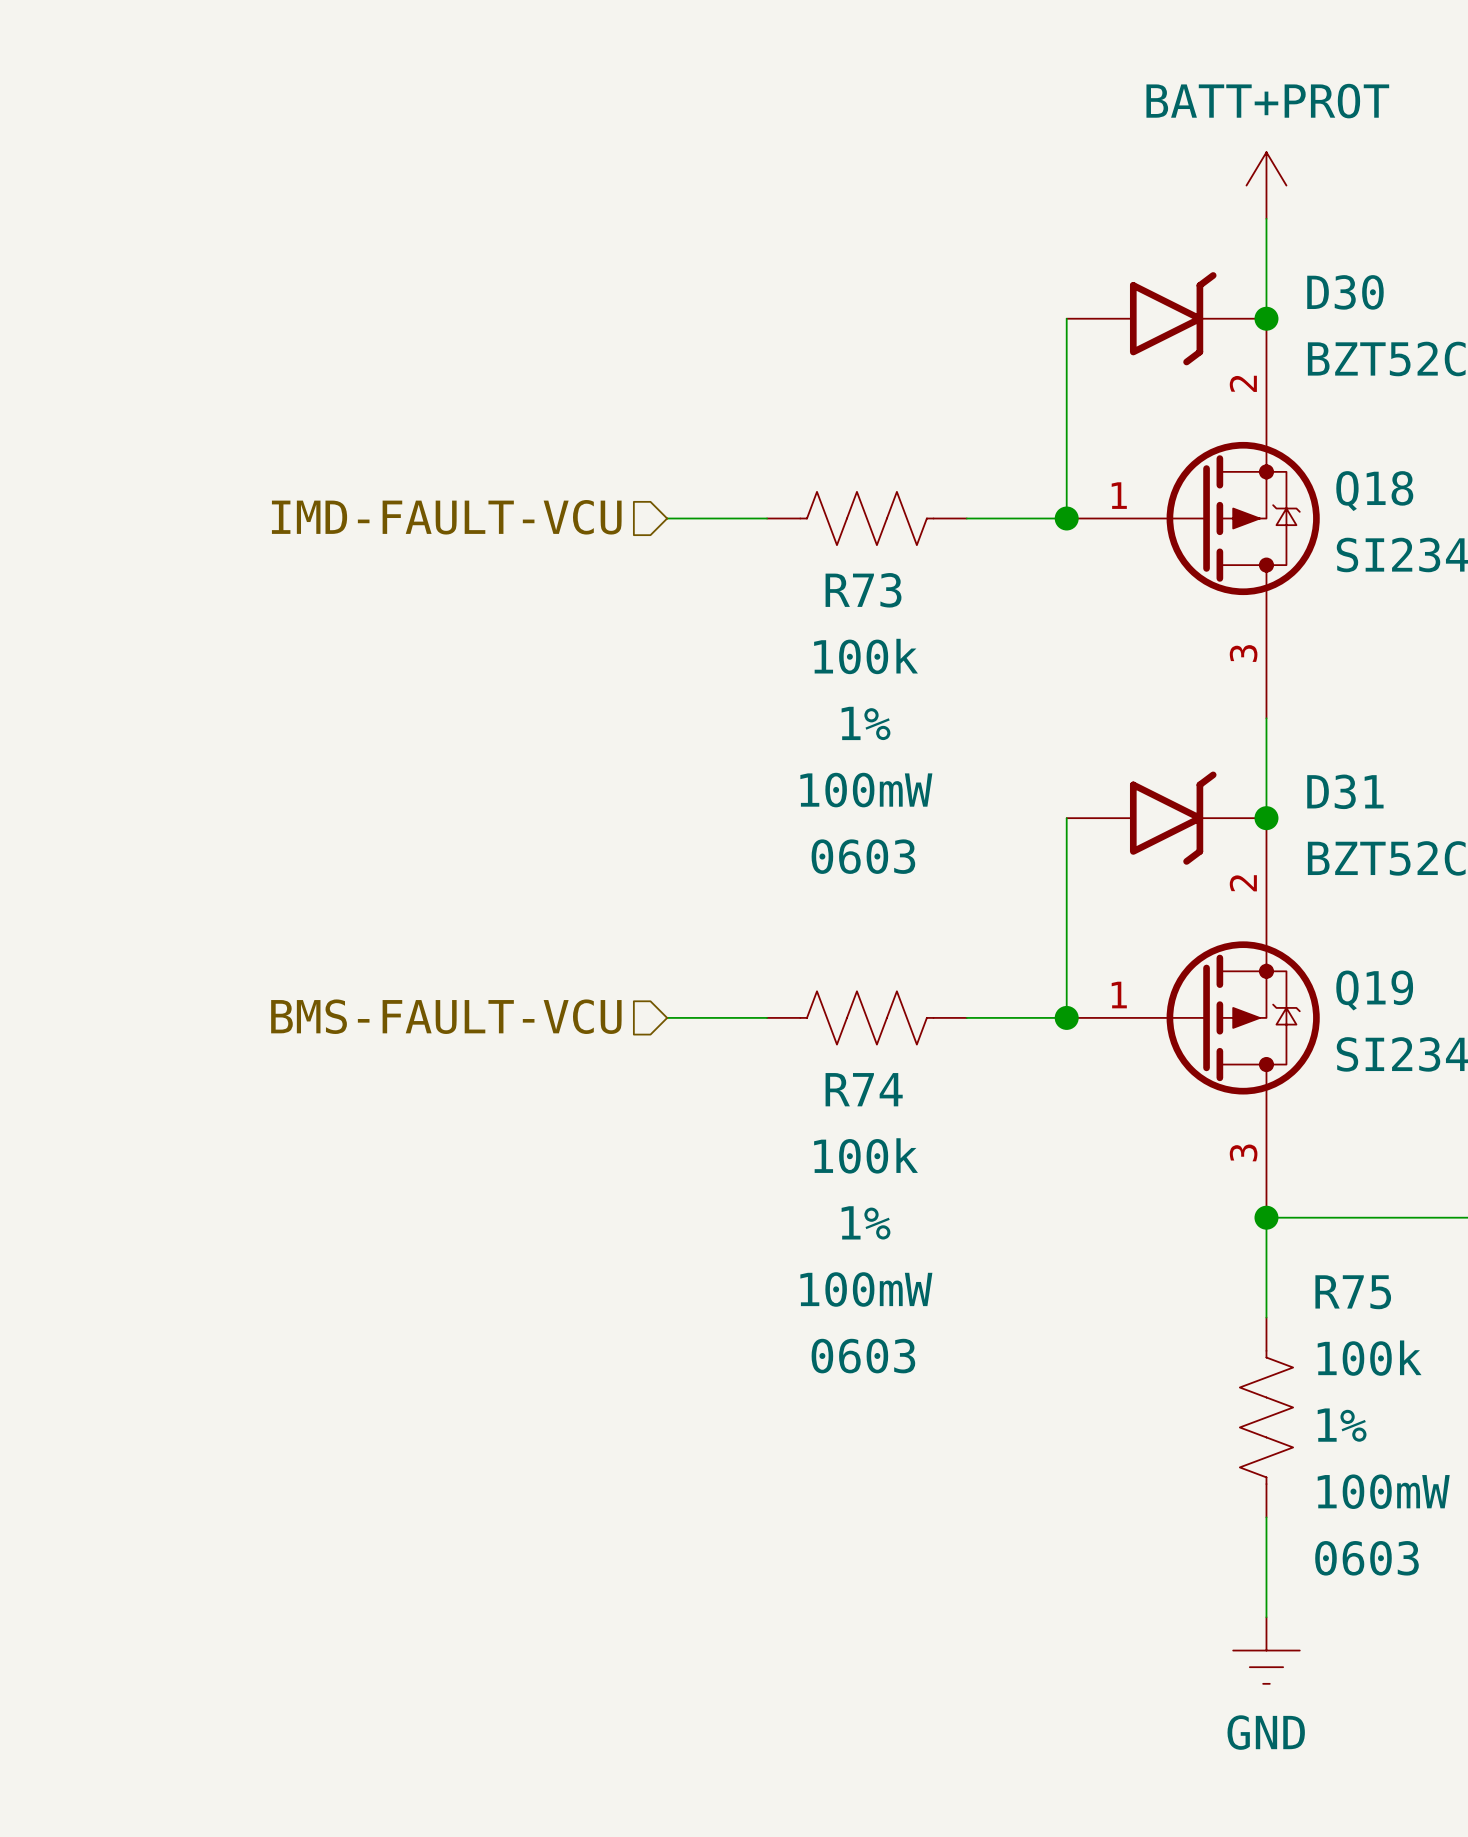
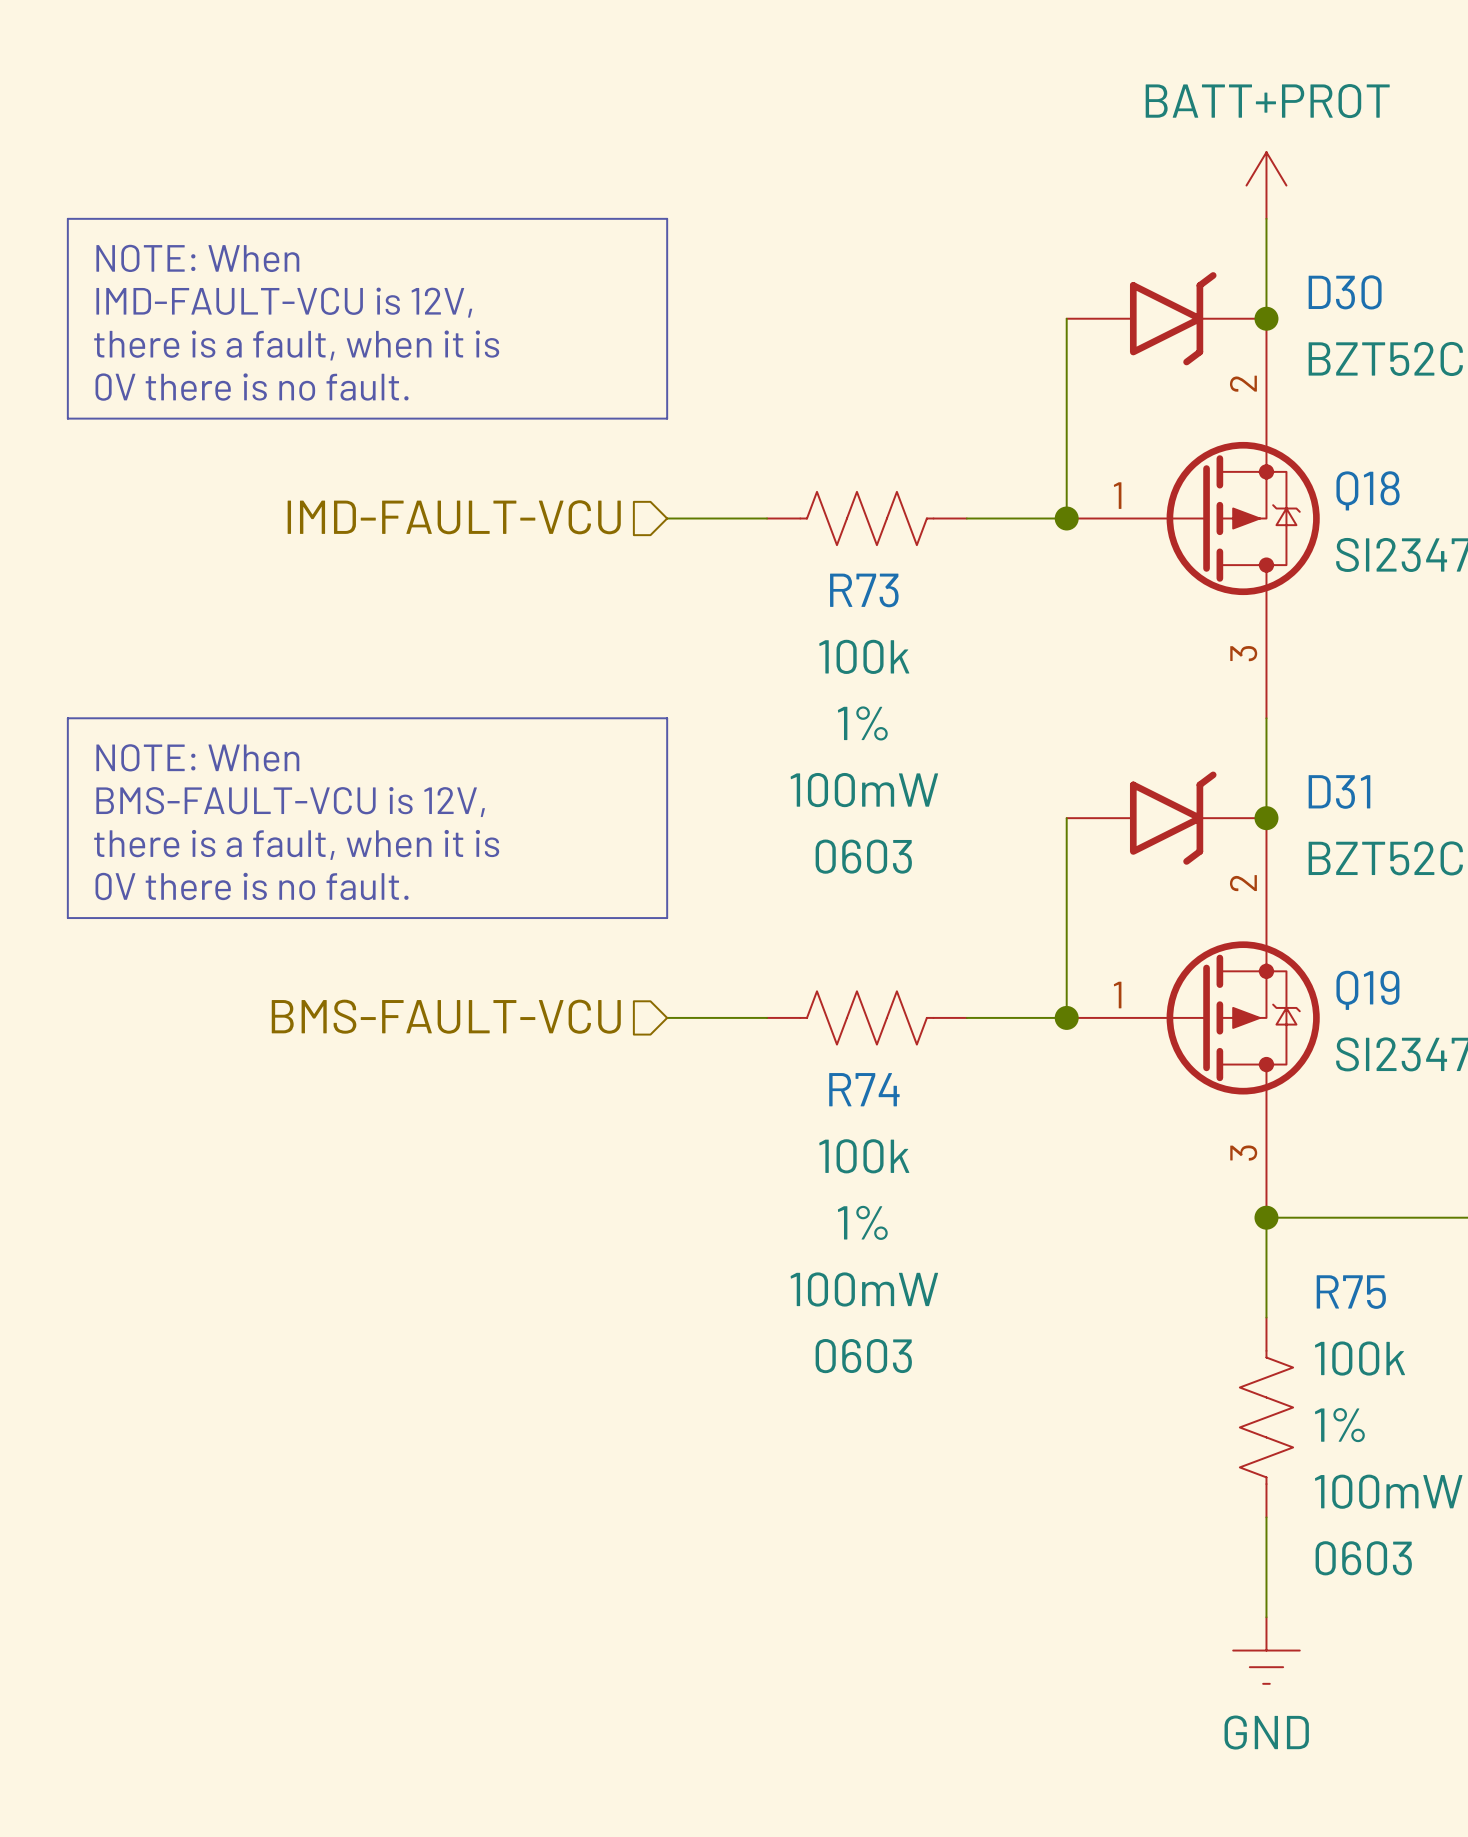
line: none -> (67, 218) (667, 218) (667, 418) (67, 418) (67, 218)
text: none -> NOTE: When (197, 258)
text: none -> IMD-FAULT-VCU is 12V, (284, 302)
text: none -> there is a fault, when it is (296, 345)
text: none -> 0V there is no fault. (252, 387)
line: none -> (67, 718) (67, 918) (667, 918) (667, 718) (67, 718)
text: none -> NOTE: When (197, 757)
text: none -> BMS-FAULT-VCU is 12V, (290, 802)
text: none -> there is a fault, when it is (296, 844)
text: none -> 0V there is no fault. (252, 886)

